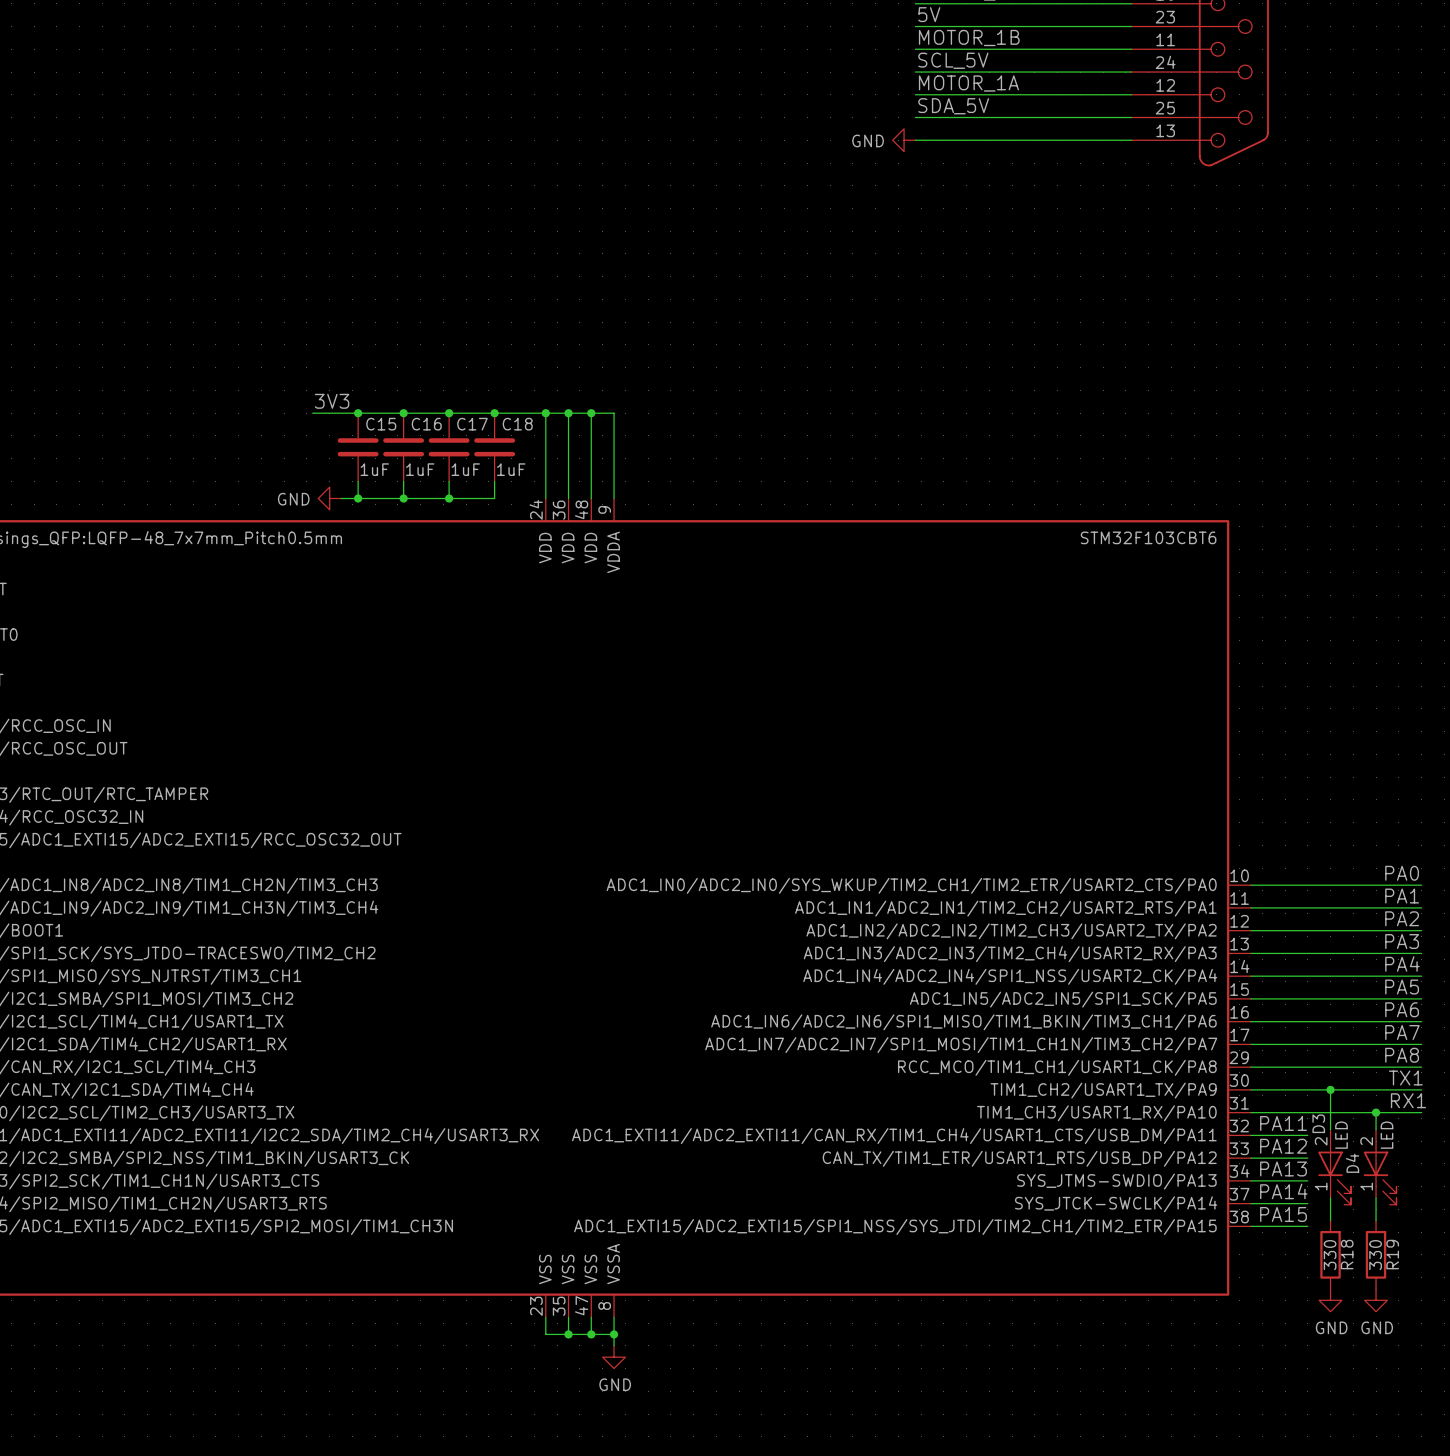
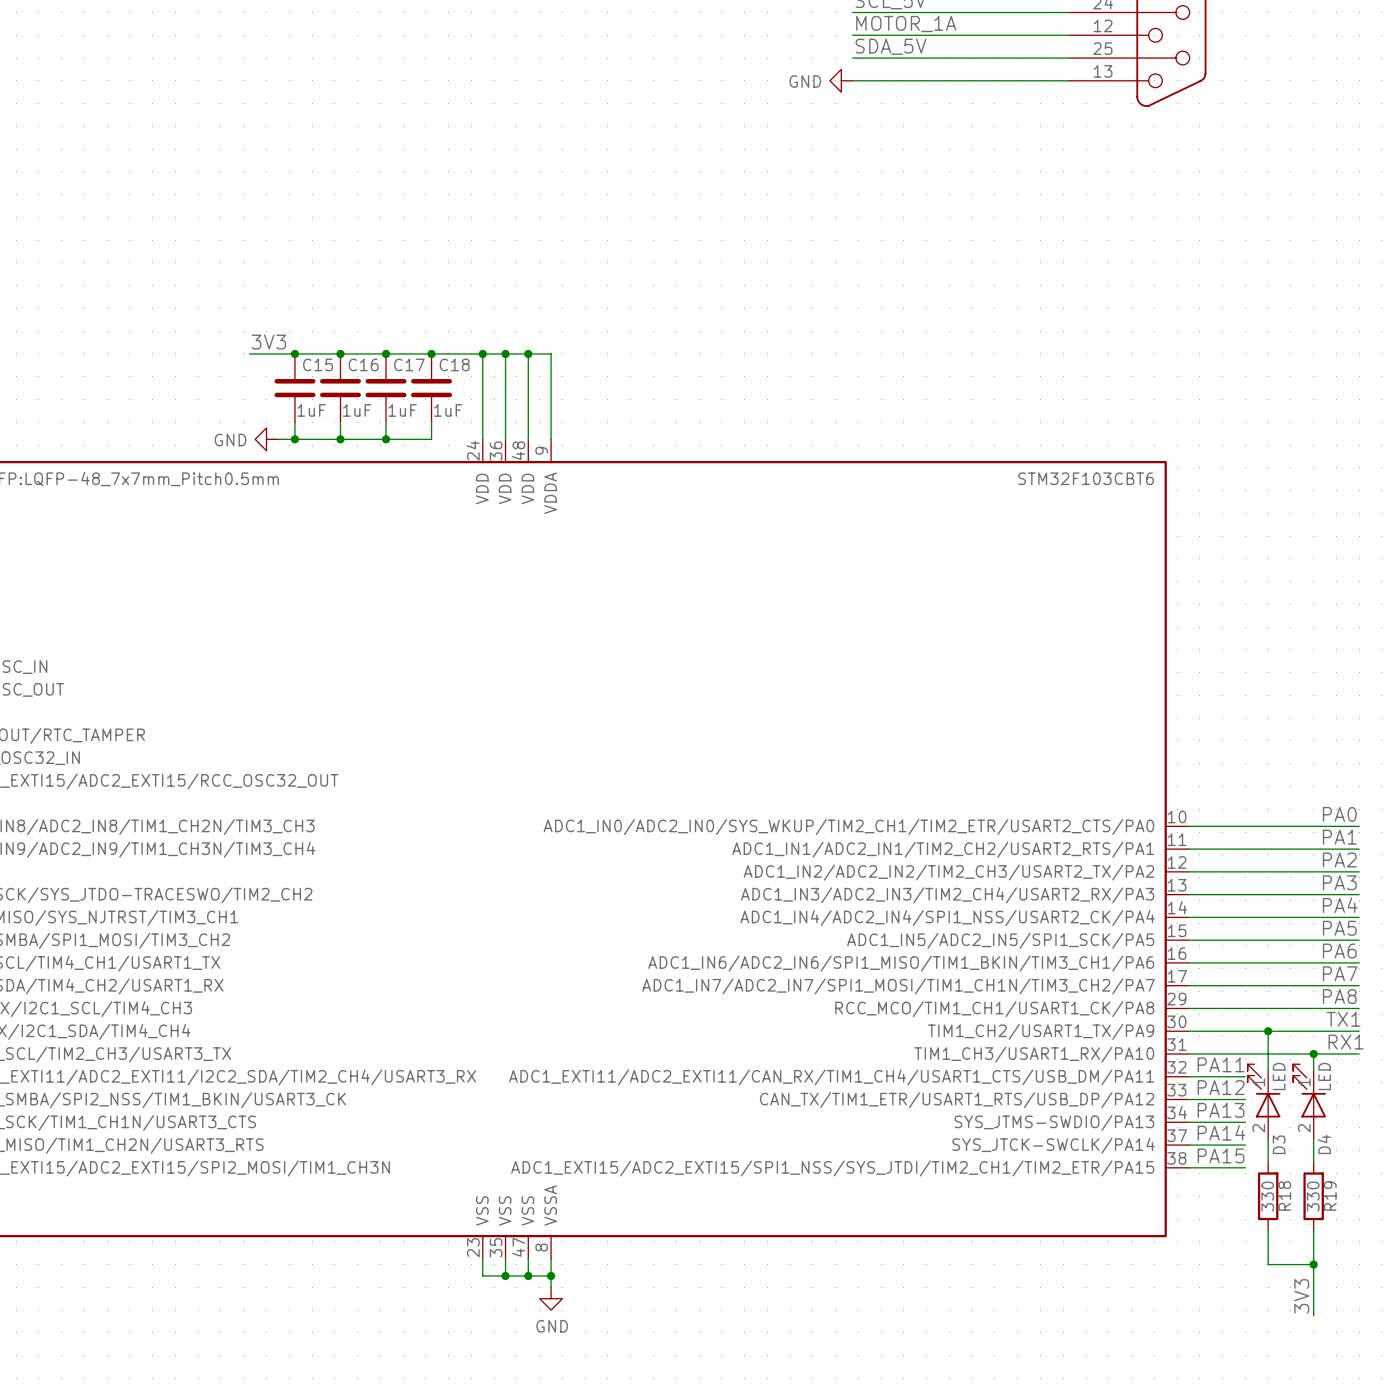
D4 name position: D4 (1352, 1163) -> D4 (1324, 1144)
D3 rotation: 0° (1334, 1178) -> 180° (1264, 1090)
D4 rotation: 0° (1380, 1178) -> 180° (1309, 1090)
wire: none -> (1268, 1230) (1268, 1264) (1313, 1264)
wire: none -> (1313, 1230) (1313, 1315)
power symbol: GND (1330, 1300) -> none
power symbol: GND (1376, 1300) -> none
junction: none -> (1313, 1264)
label: none -> 3V3 (1301, 1296)

